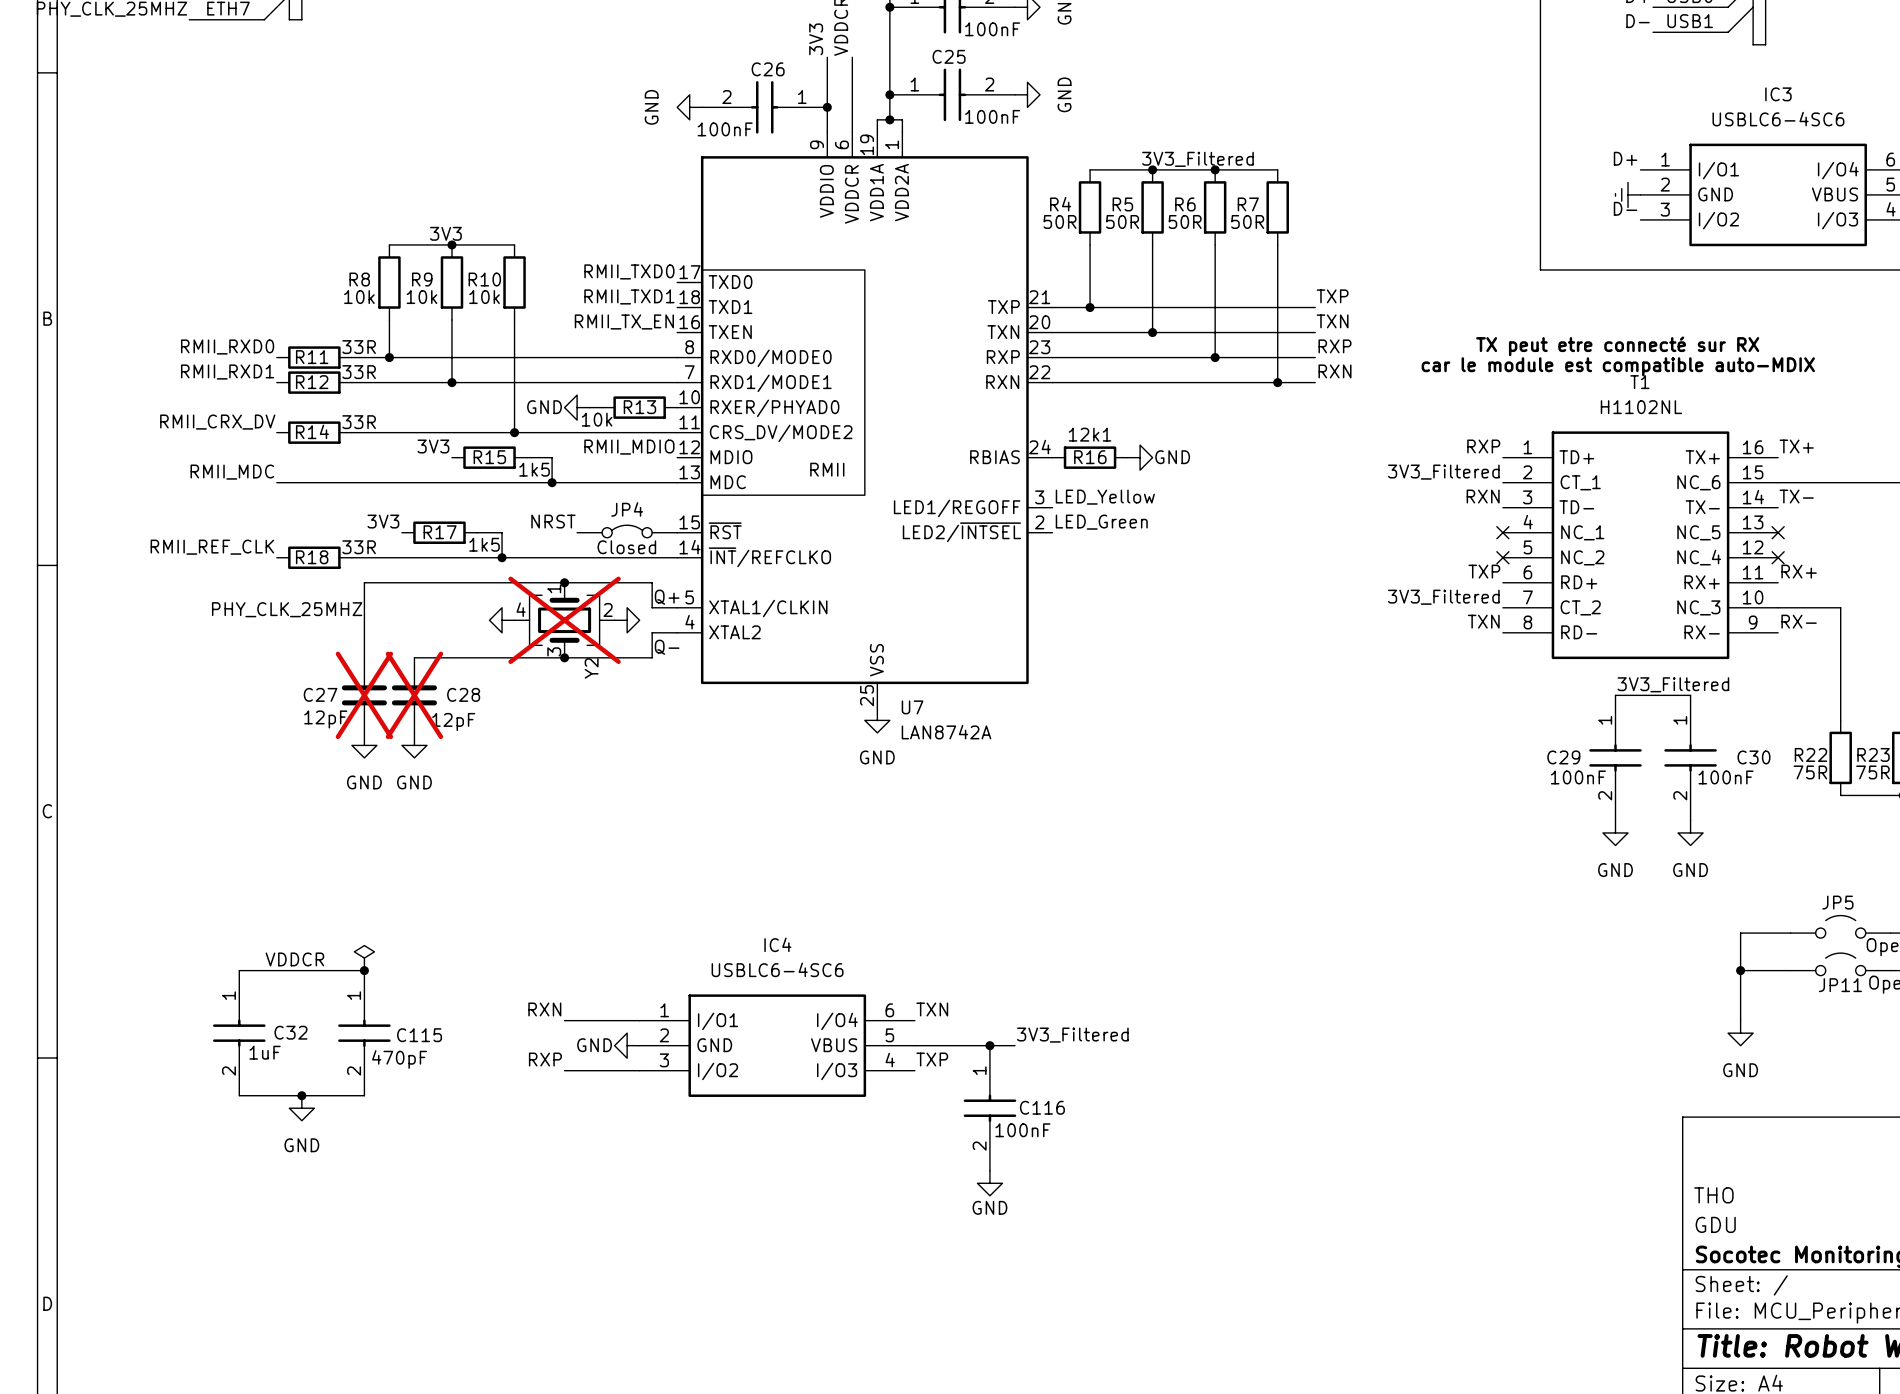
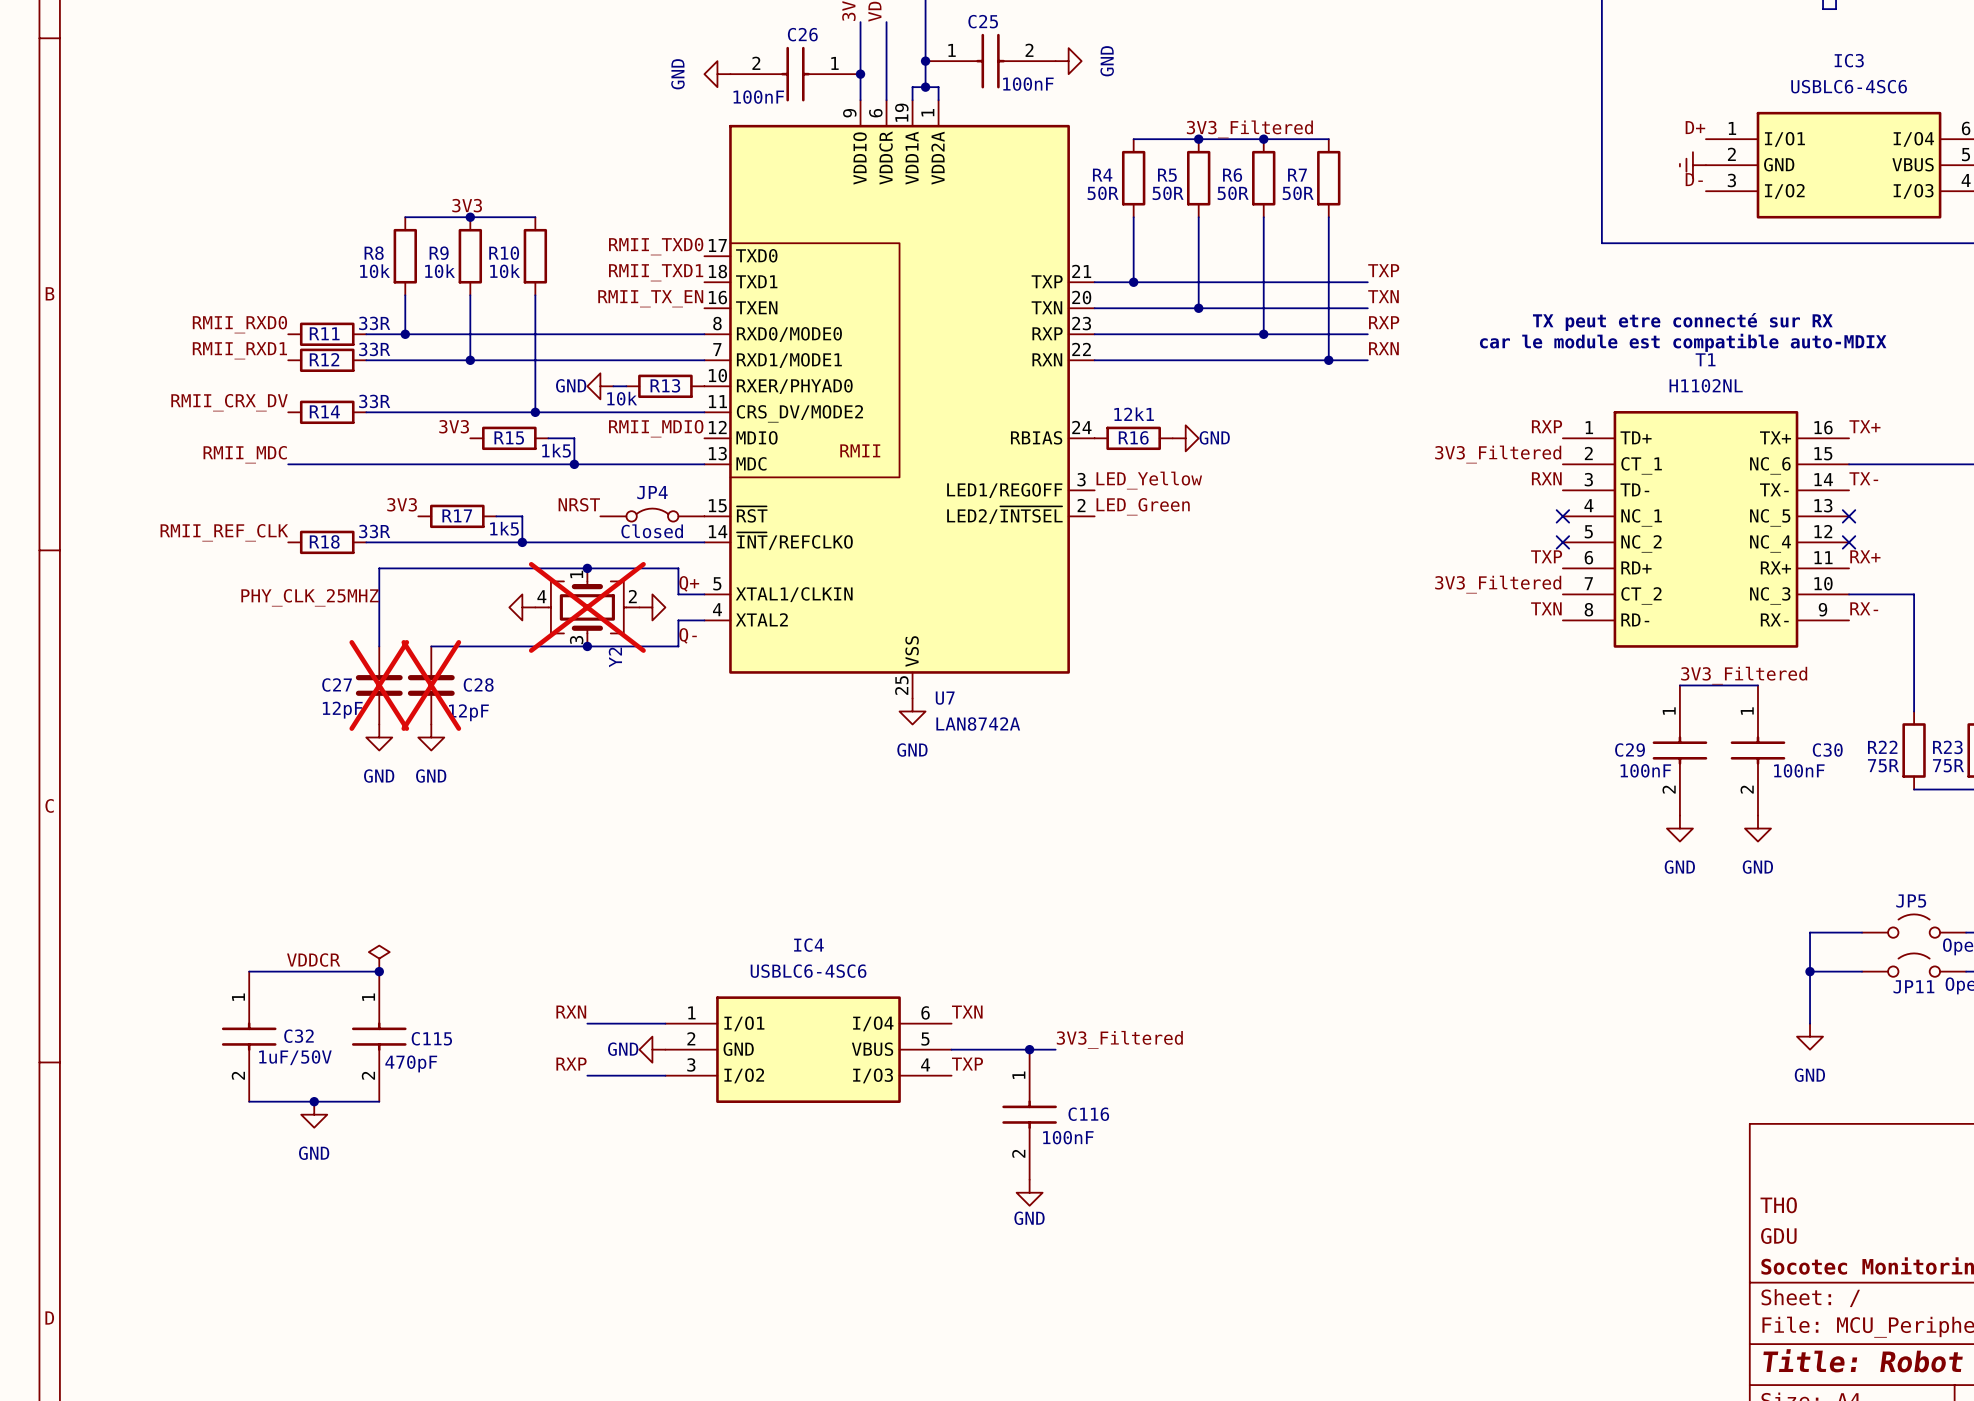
C32 value: 1uF (265, 1052) -> 1uF/50V (295, 1057)

